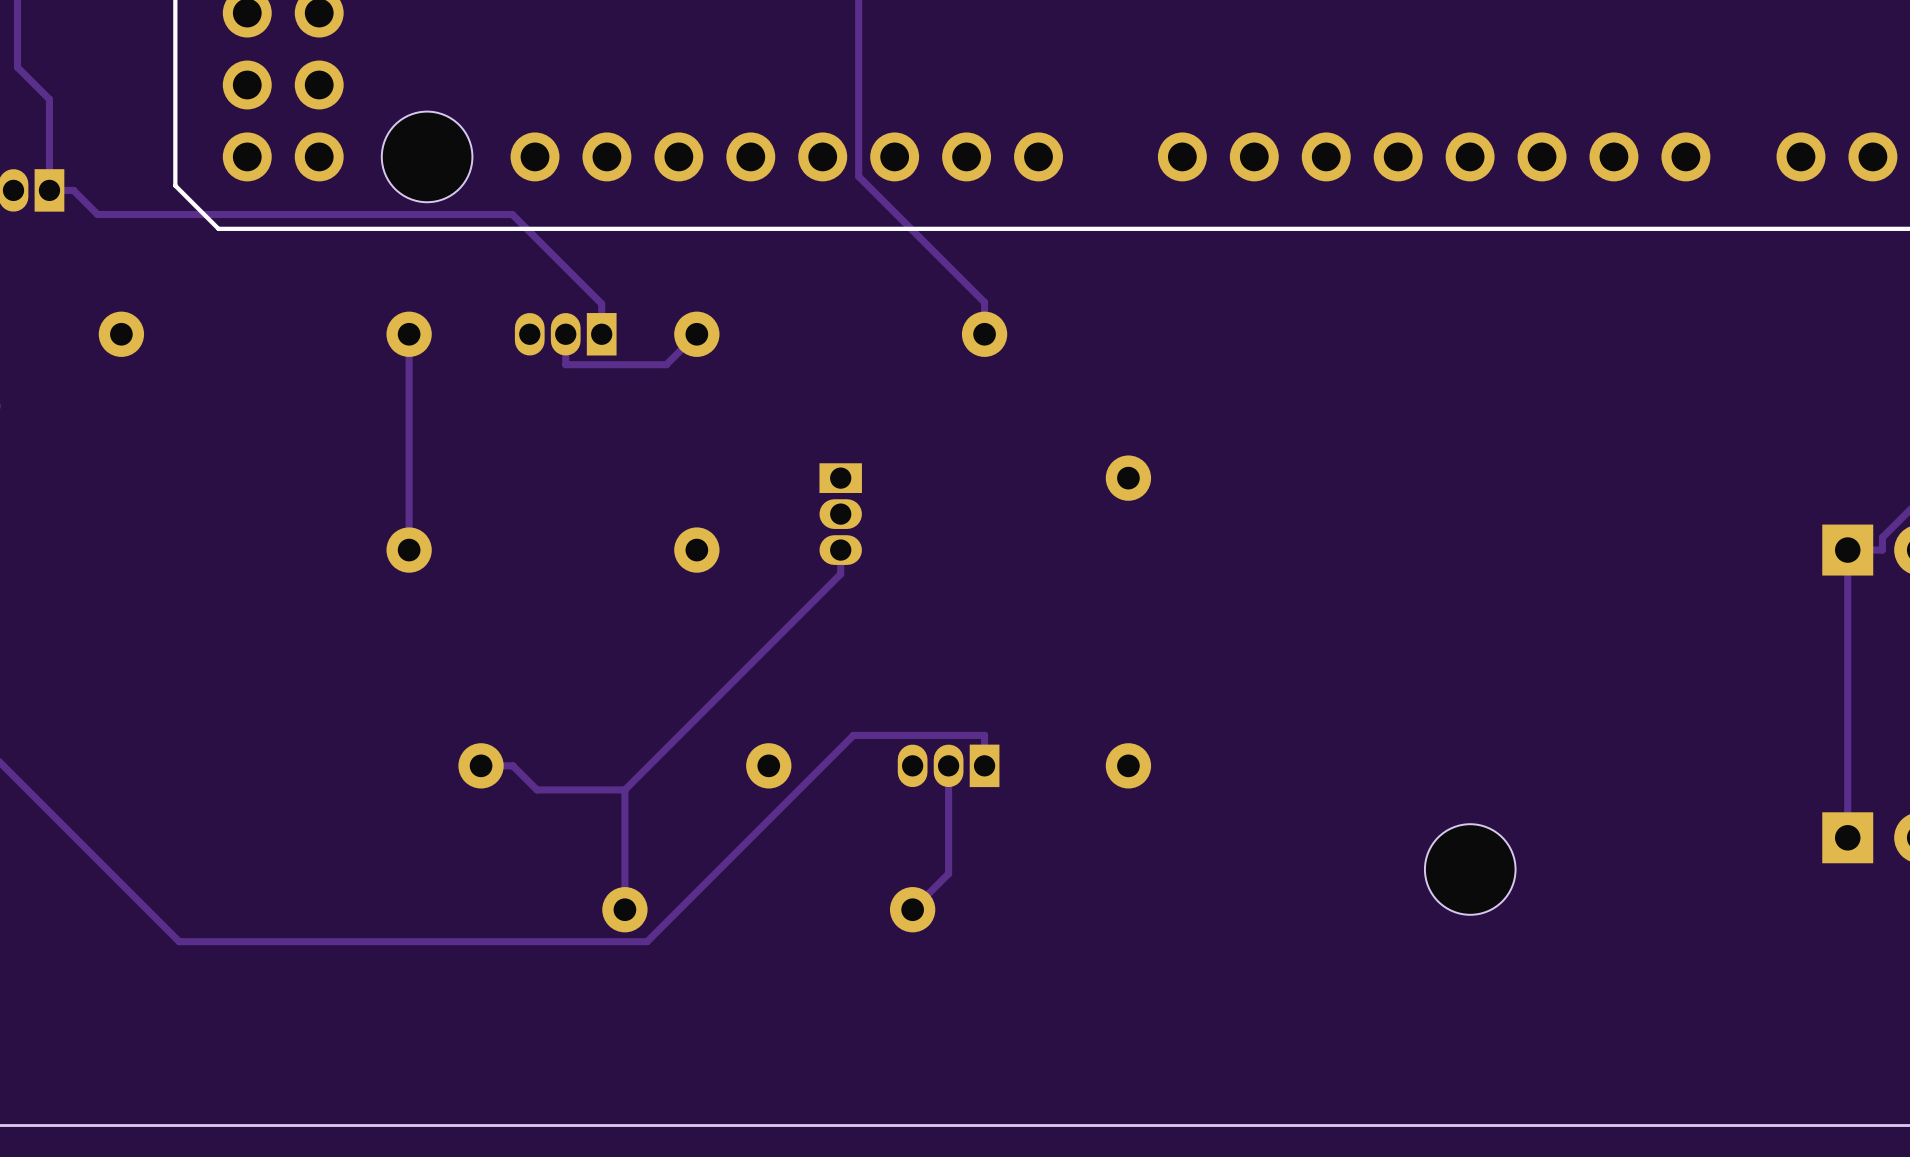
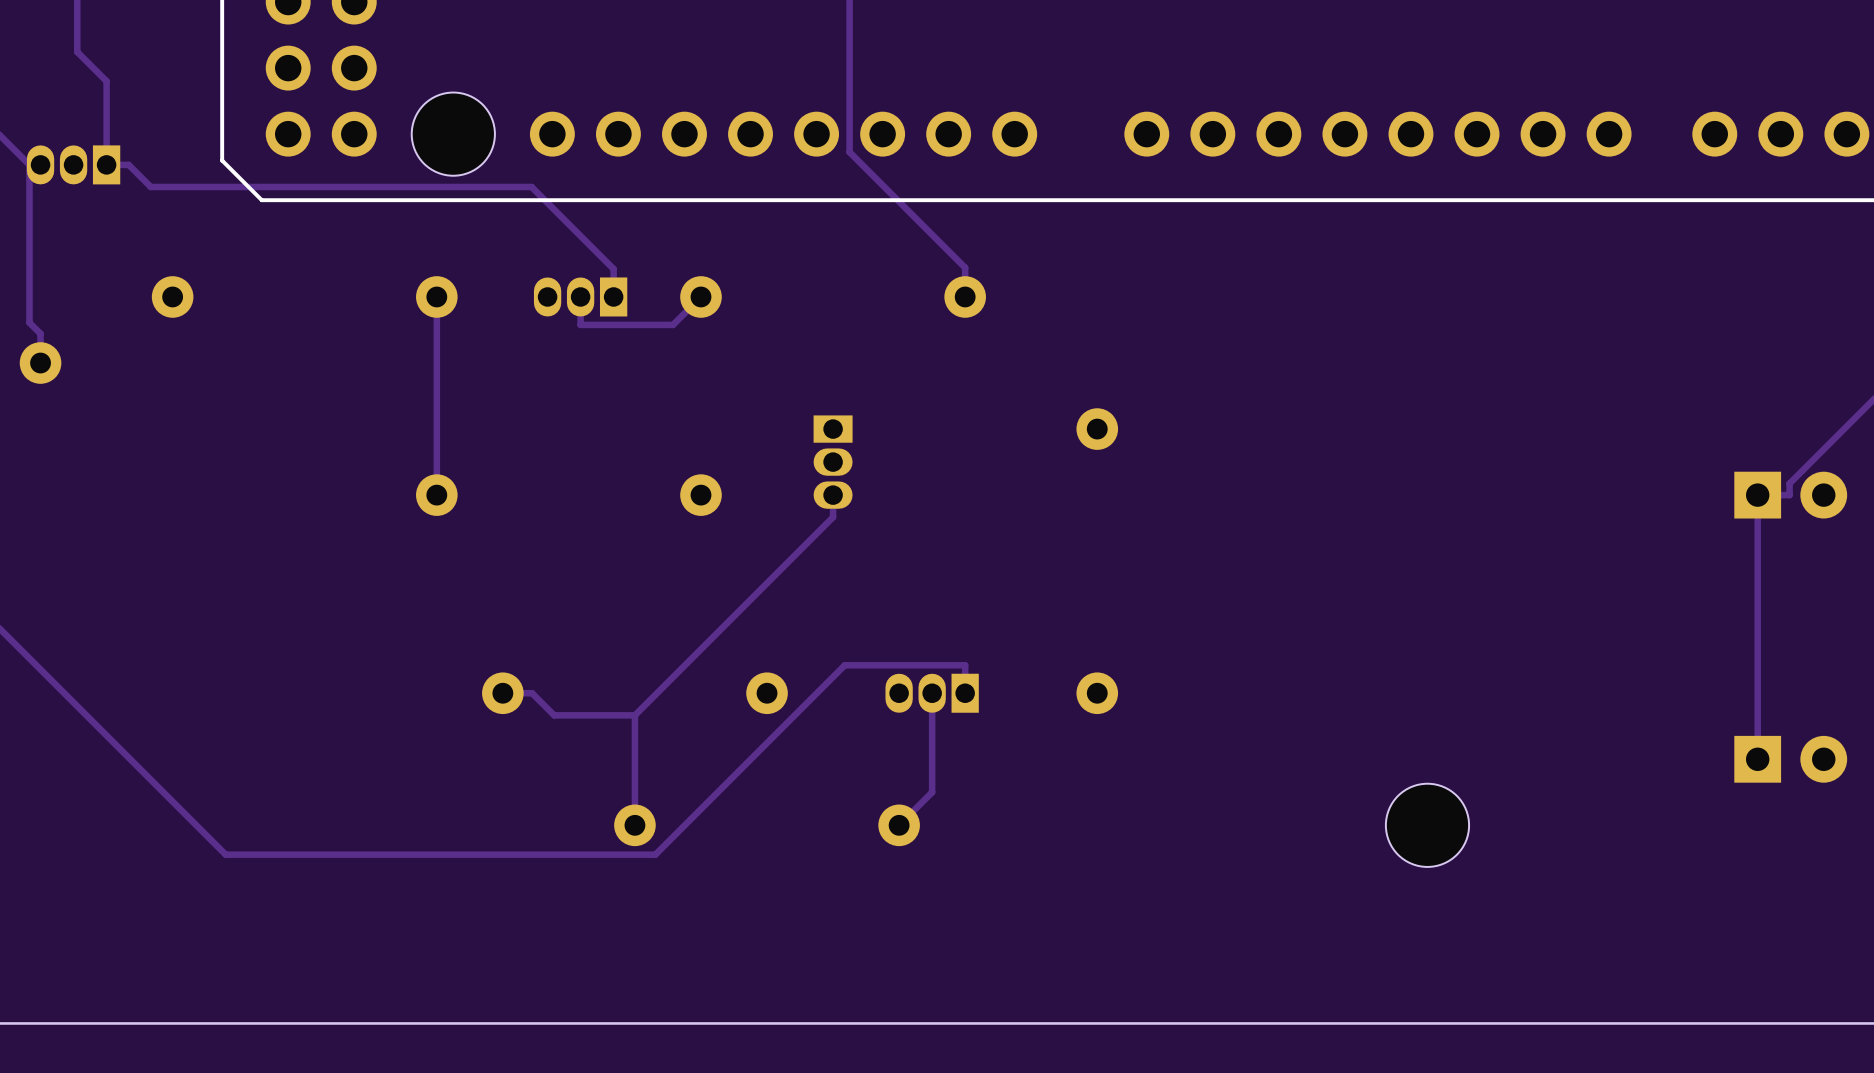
part position: (1470, 869) -> (1427, 825)

